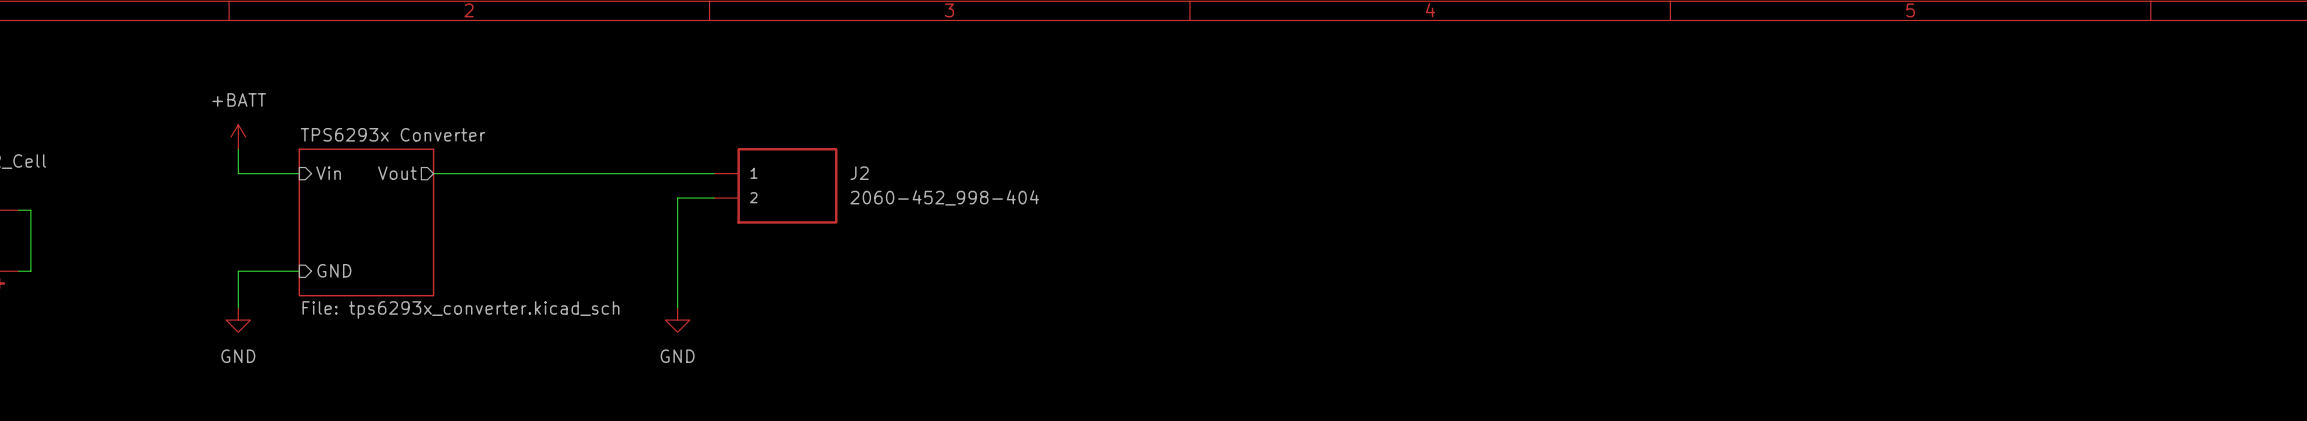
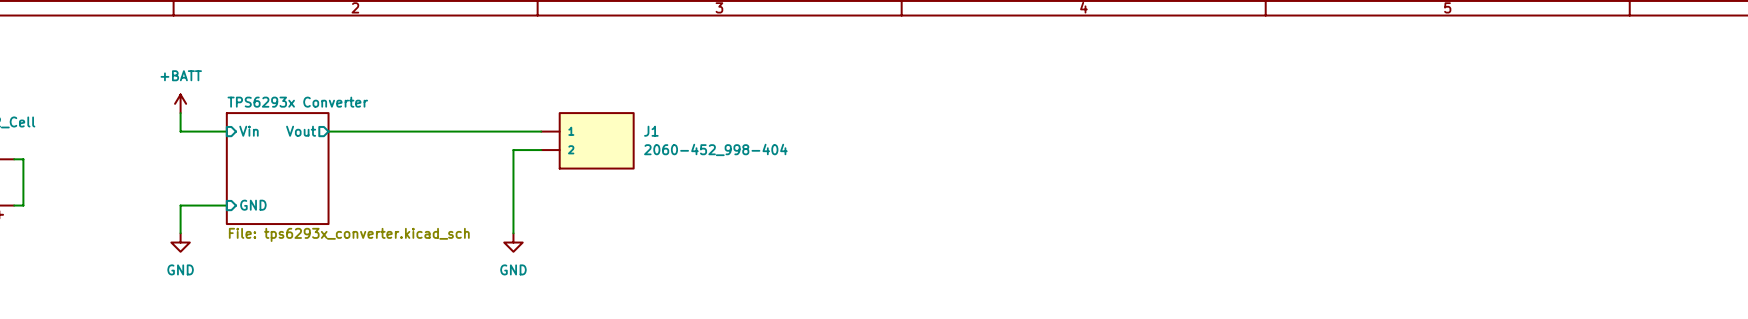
J2 name: J2 (859, 173) -> J1 (651, 131)

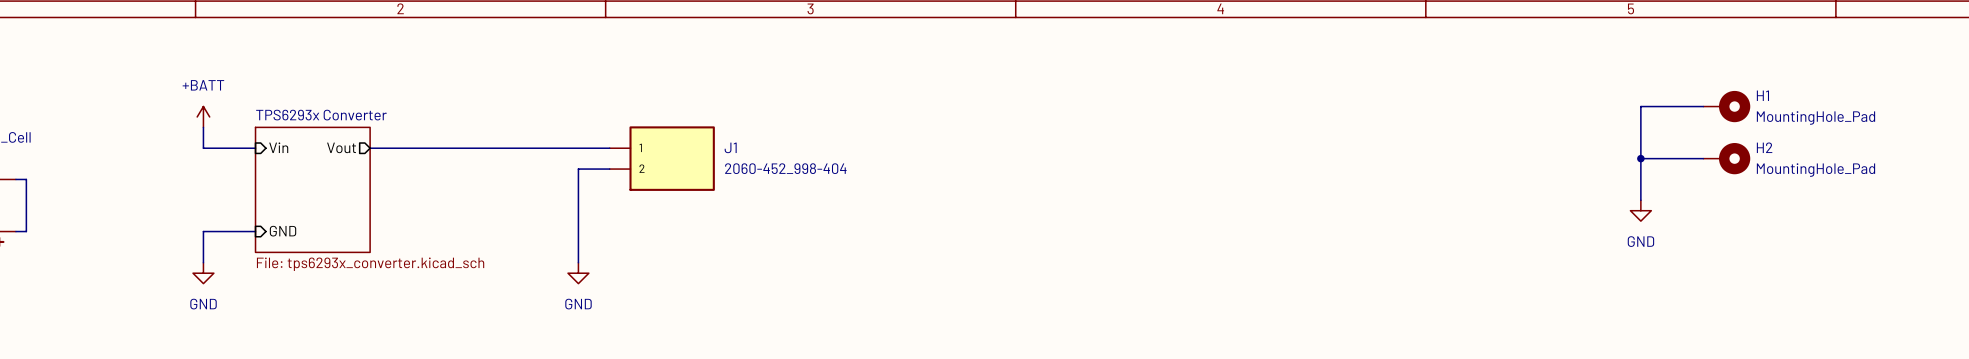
wire: none -> (1703, 106) (1640, 106) (1640, 200)
H1: none -> MountingHole_Pad (1726, 106)
wire: none -> (1640, 158) (1703, 158)
junction: none -> (1640, 158)
H2: none -> MountingHole_Pad (1726, 158)
power symbol: none -> GND (1640, 210)

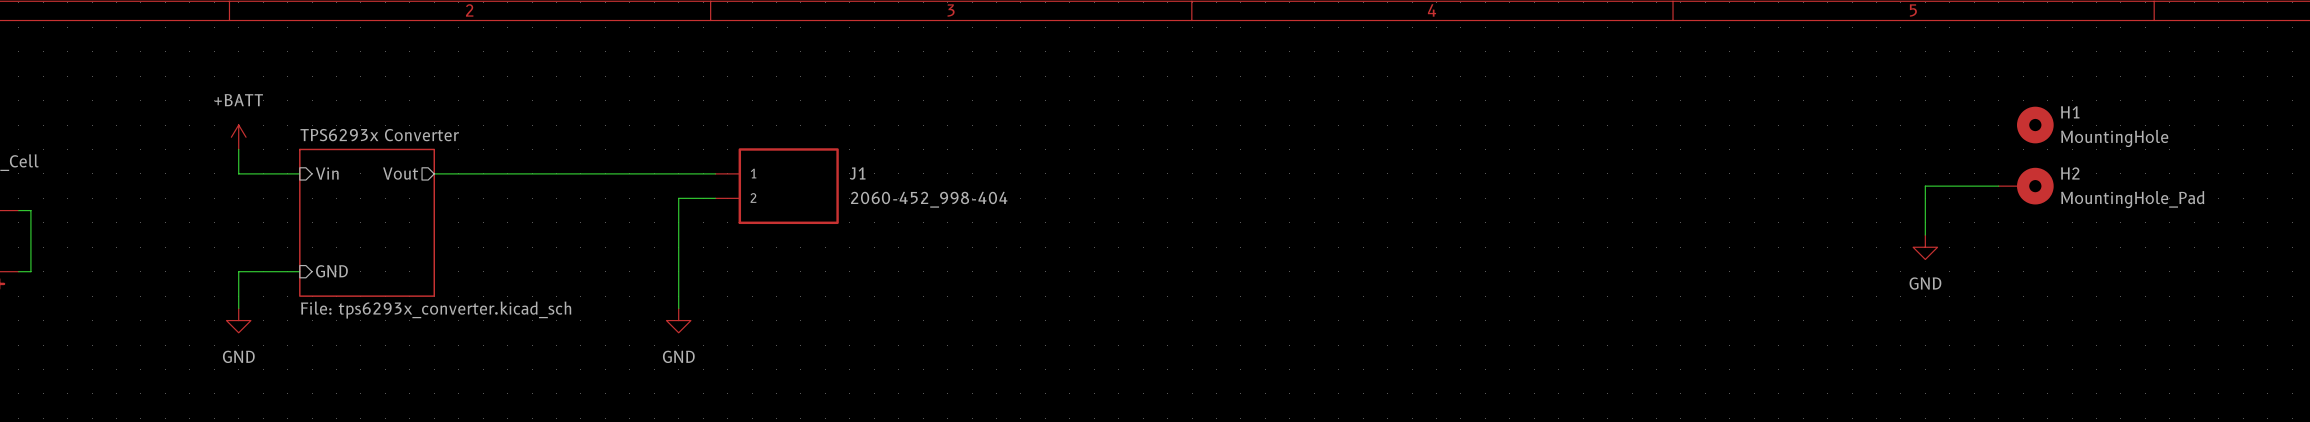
H1 symbol: [1703, 90, 1751, 123] -> [2017, 106, 2054, 144]
wire: (1703, 106) (1640, 106) (1640, 158) -> none
H1 value: MountingHole_Pad (1815, 117) -> MountingHole (2114, 138)
junction: (1640, 158) -> none

